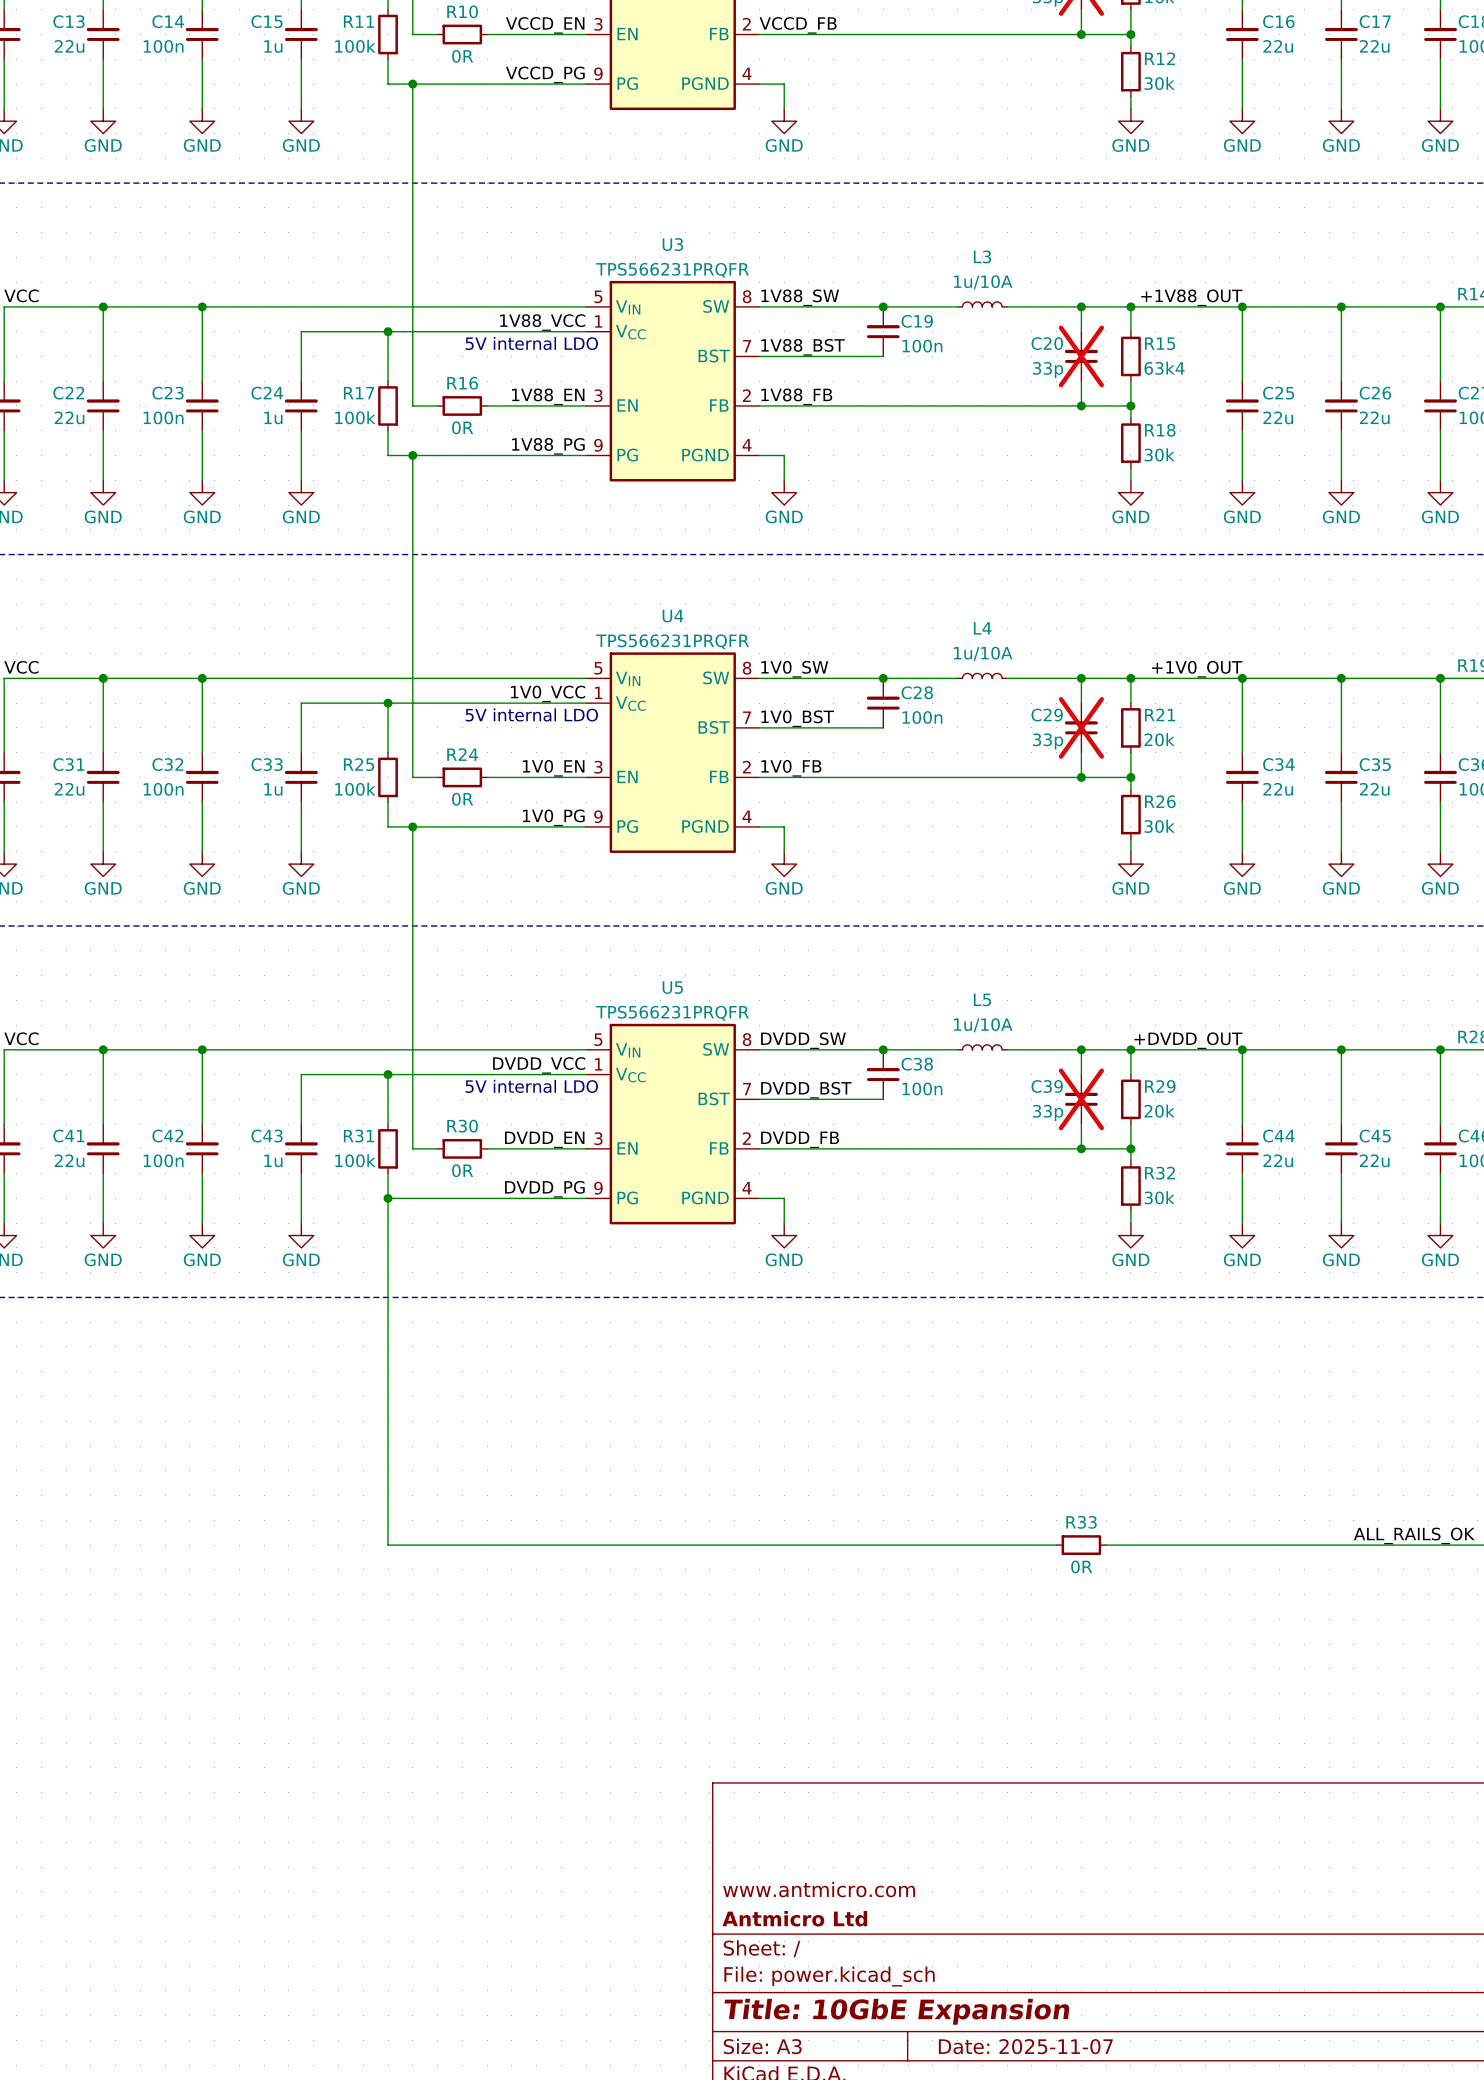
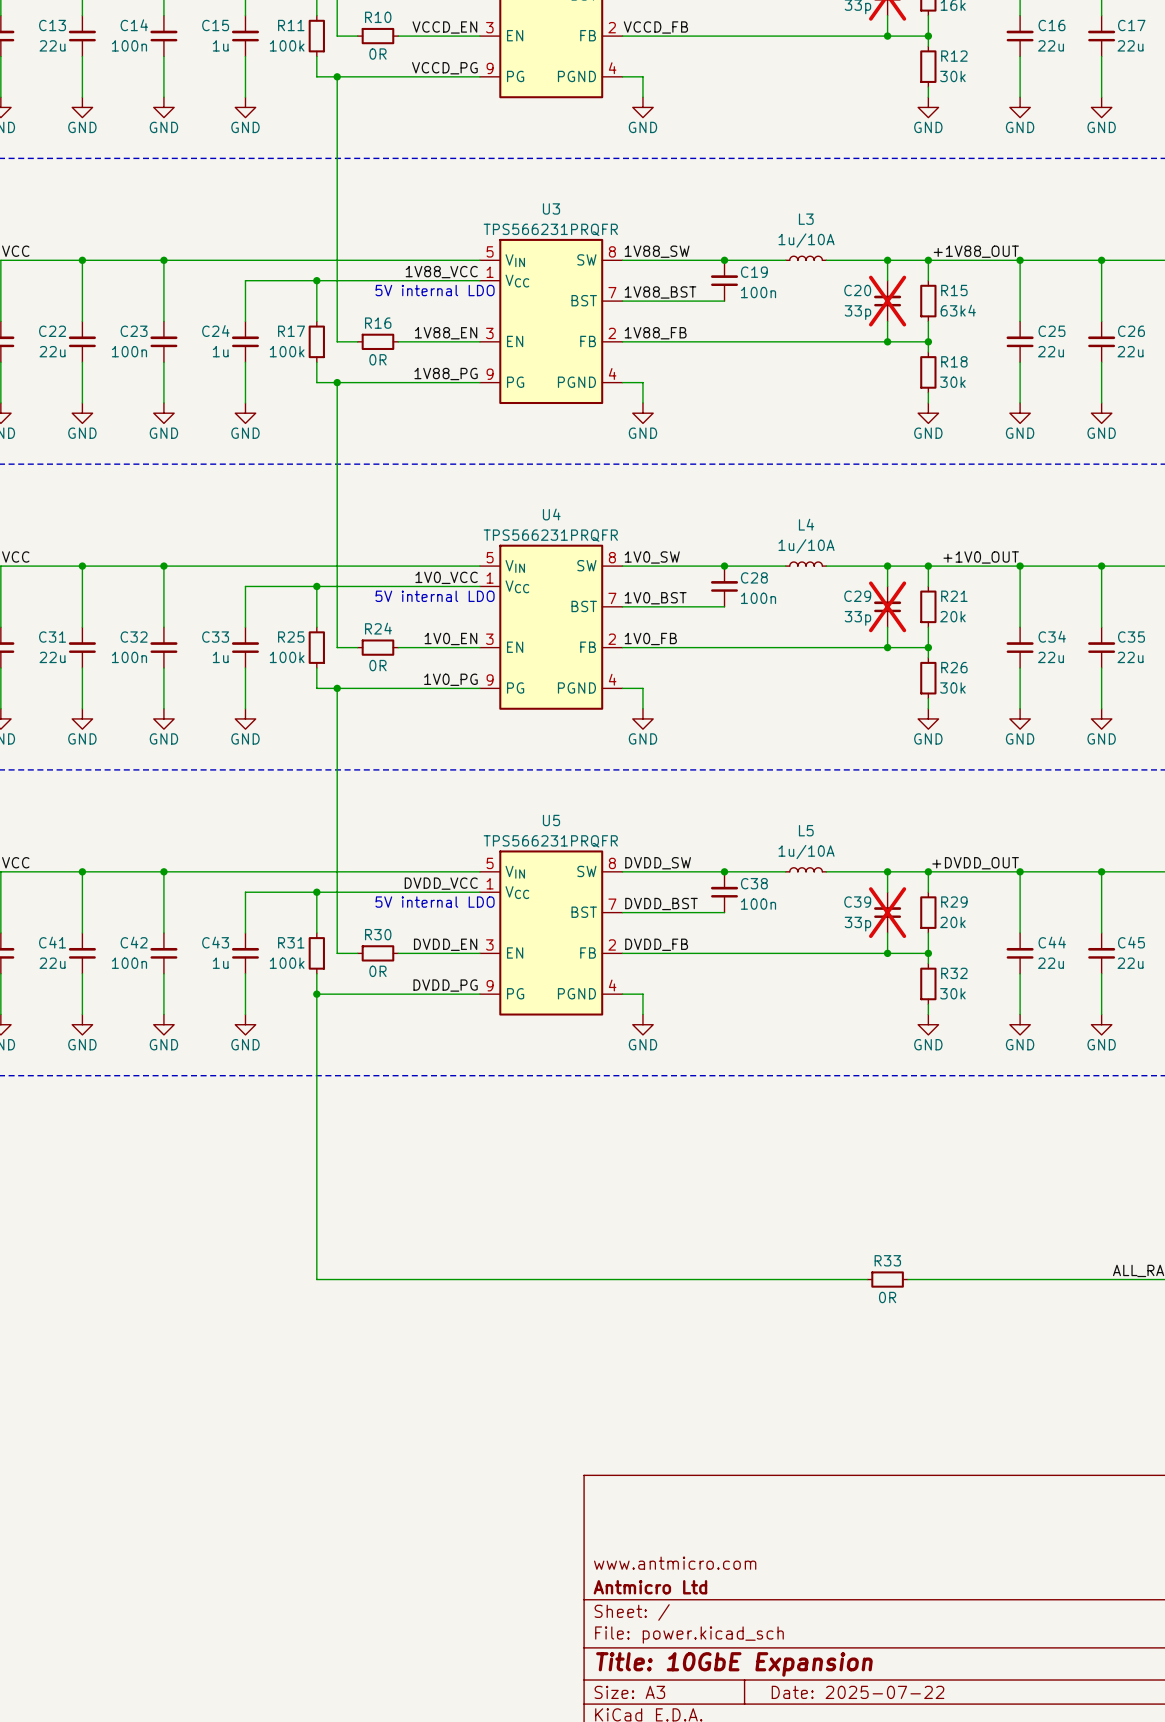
title block: Date: 2025-11-07 (1025, 2046) -> Date: 2025-07-22 (858, 1692)

